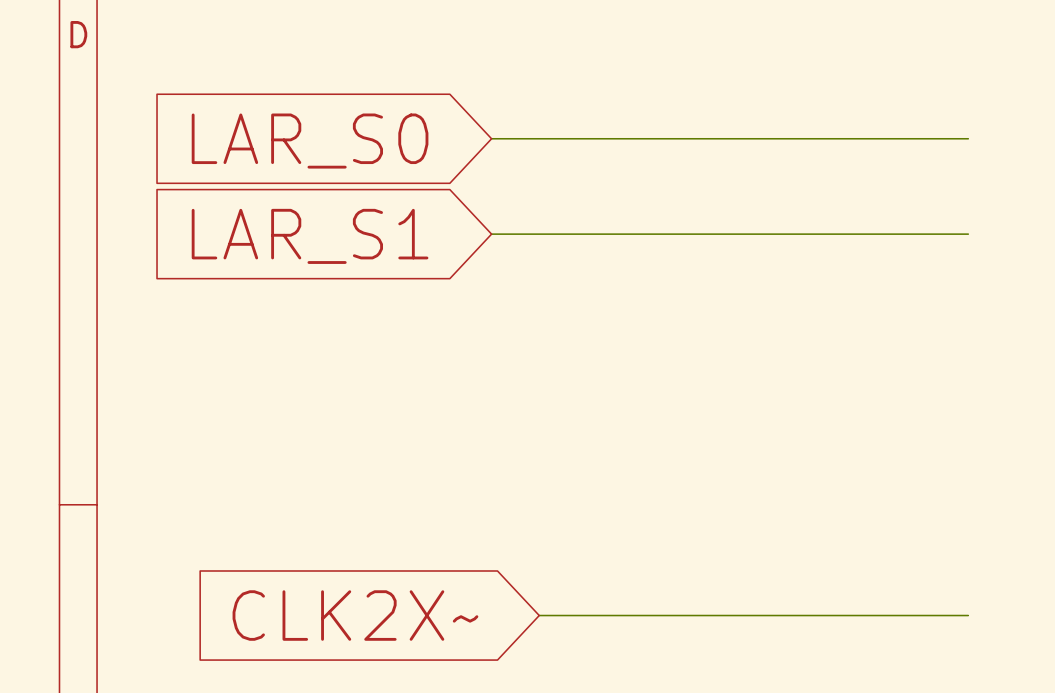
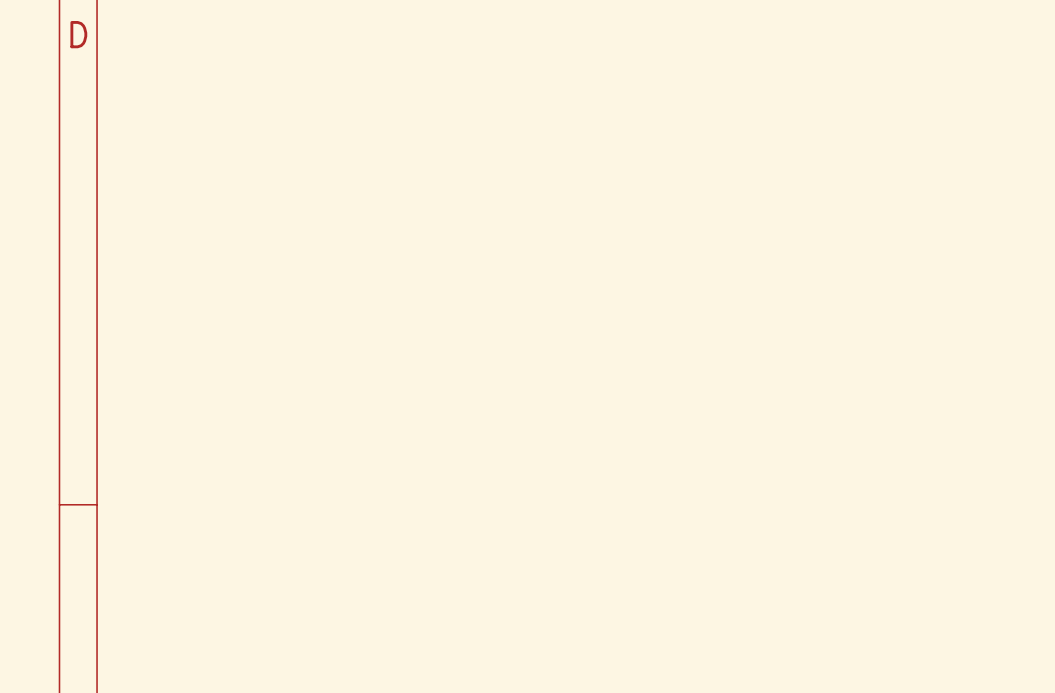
wire: (491, 138) (968, 138) -> none
global label: LAR_S0 (310, 141) -> none
wire: (491, 234) (968, 234) -> none
global label: LAR_S1 (310, 236) -> none
global label: CLK2X~ (355, 615) -> none
wire: (539, 615) (968, 615) -> none

